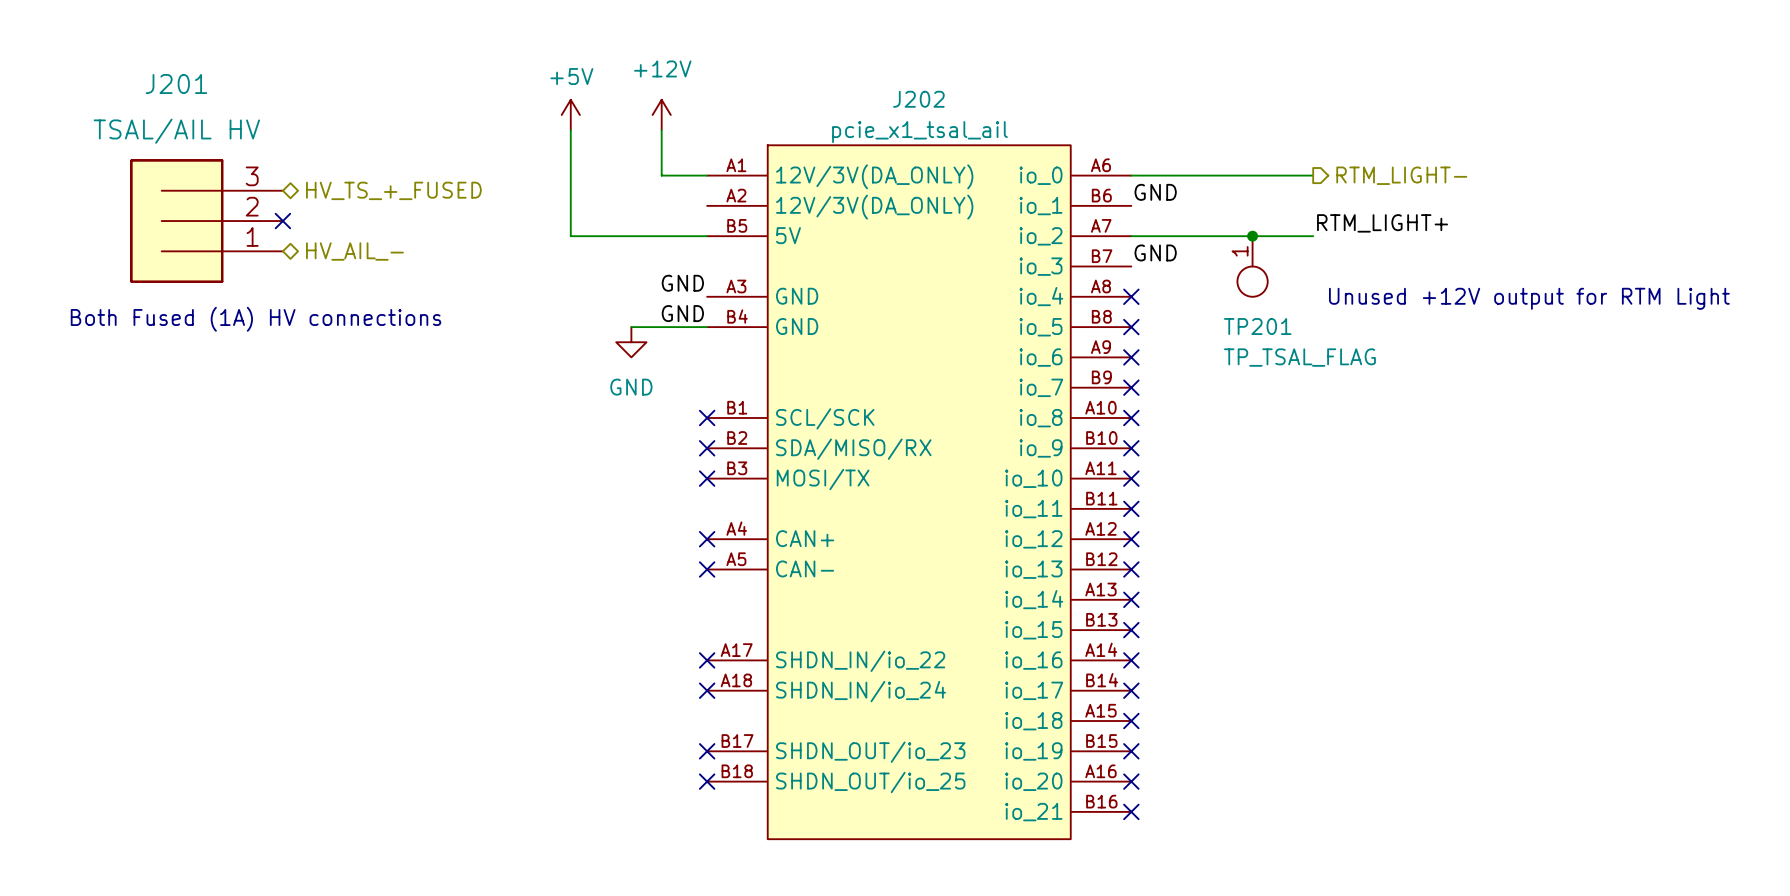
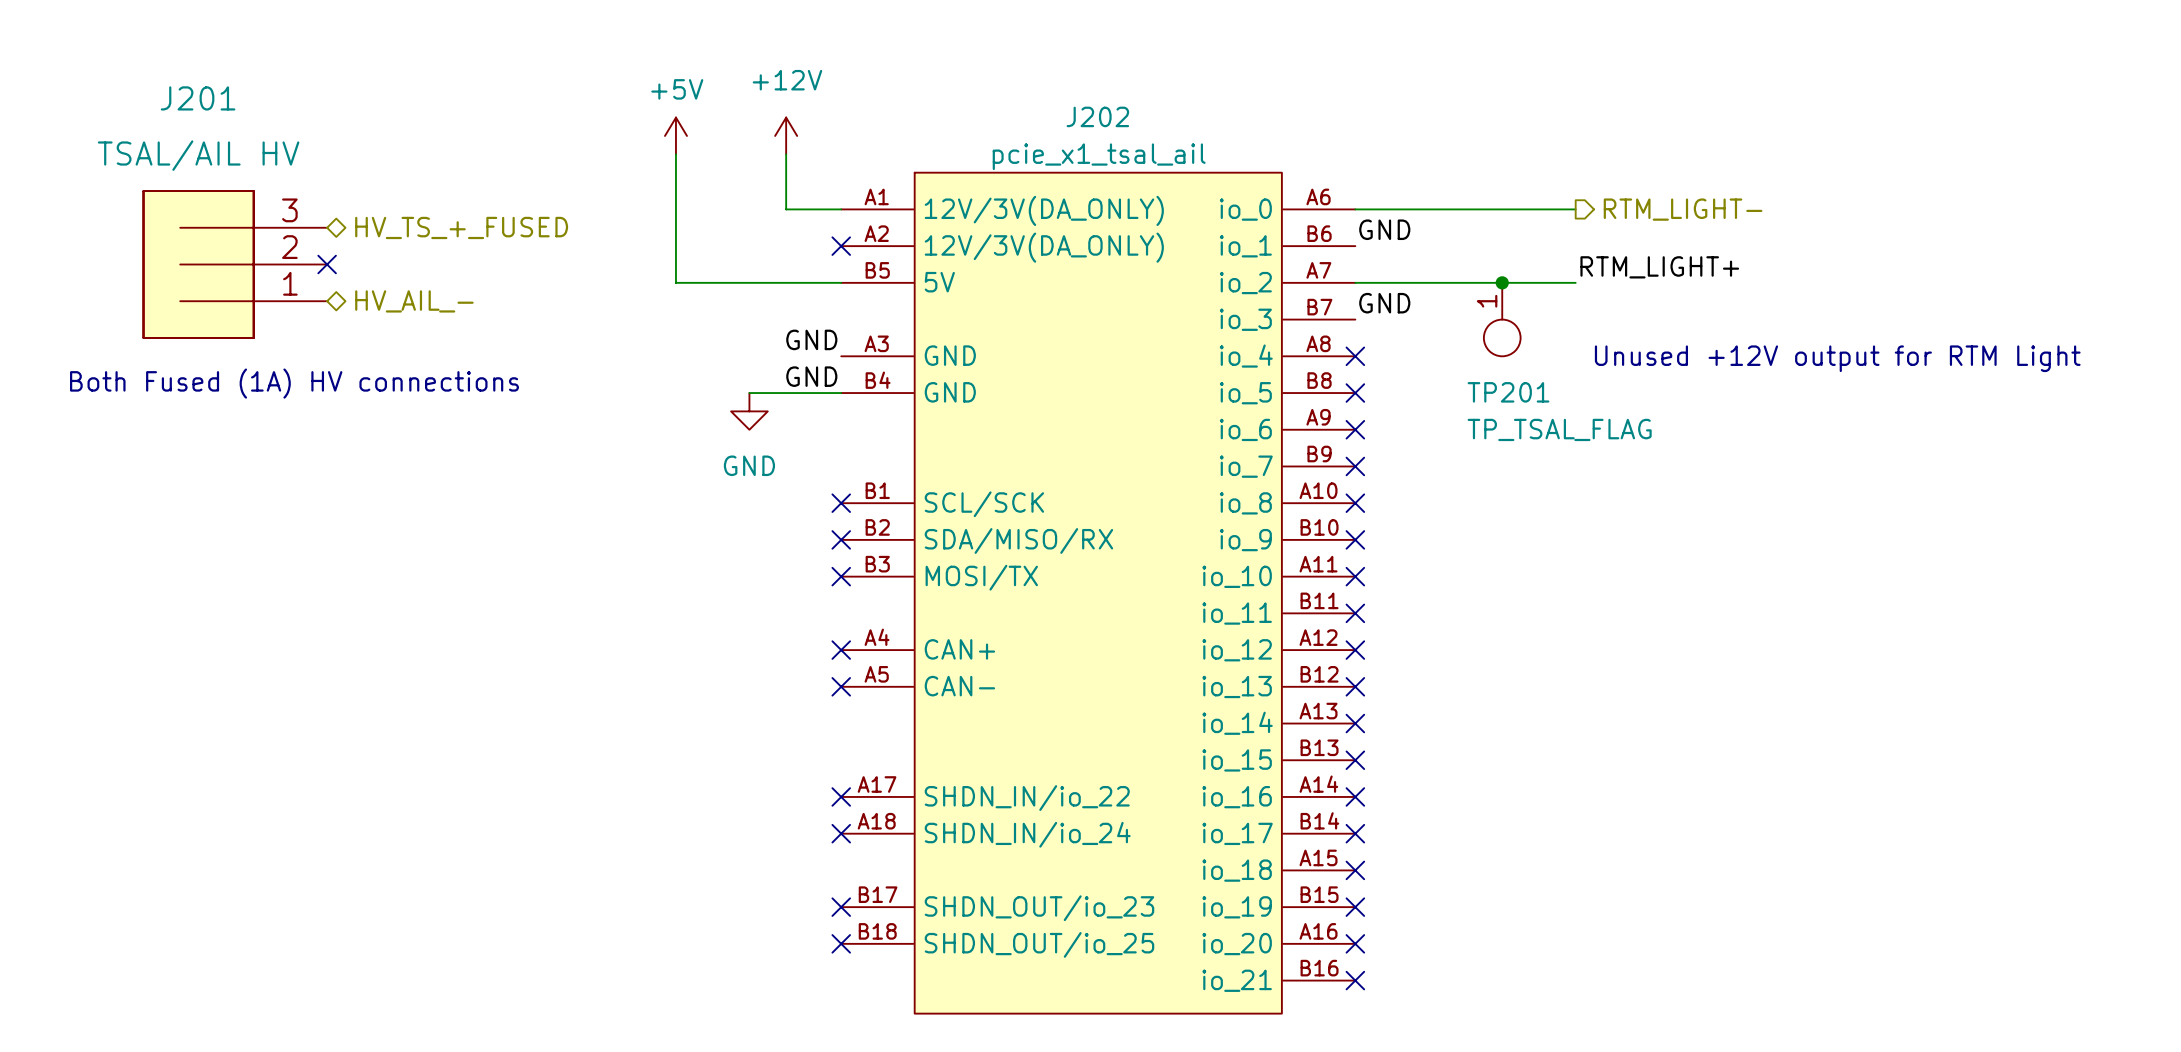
no-connect mark: none -> (841, 246)

